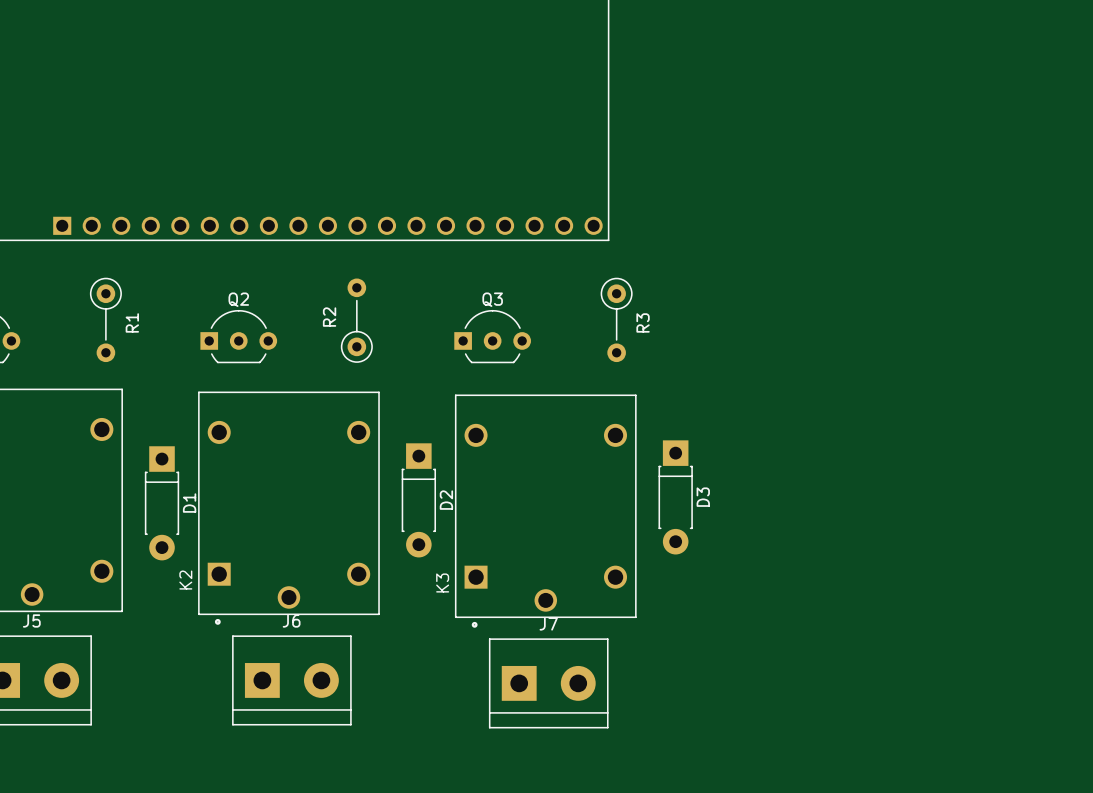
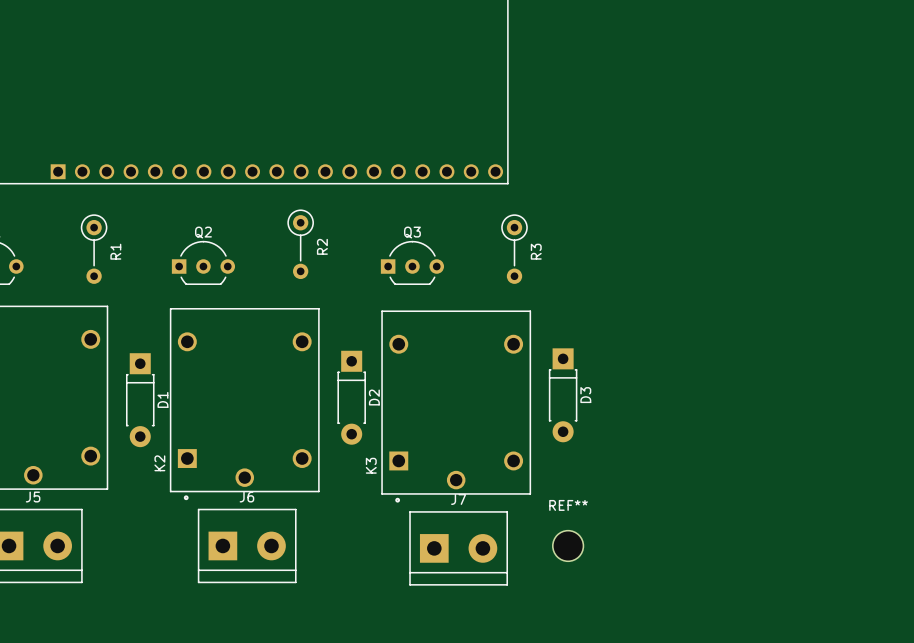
R2 rotation: 0° (356, 320) -> 180° (300, 244)
REF**: none -> (568, 545)

